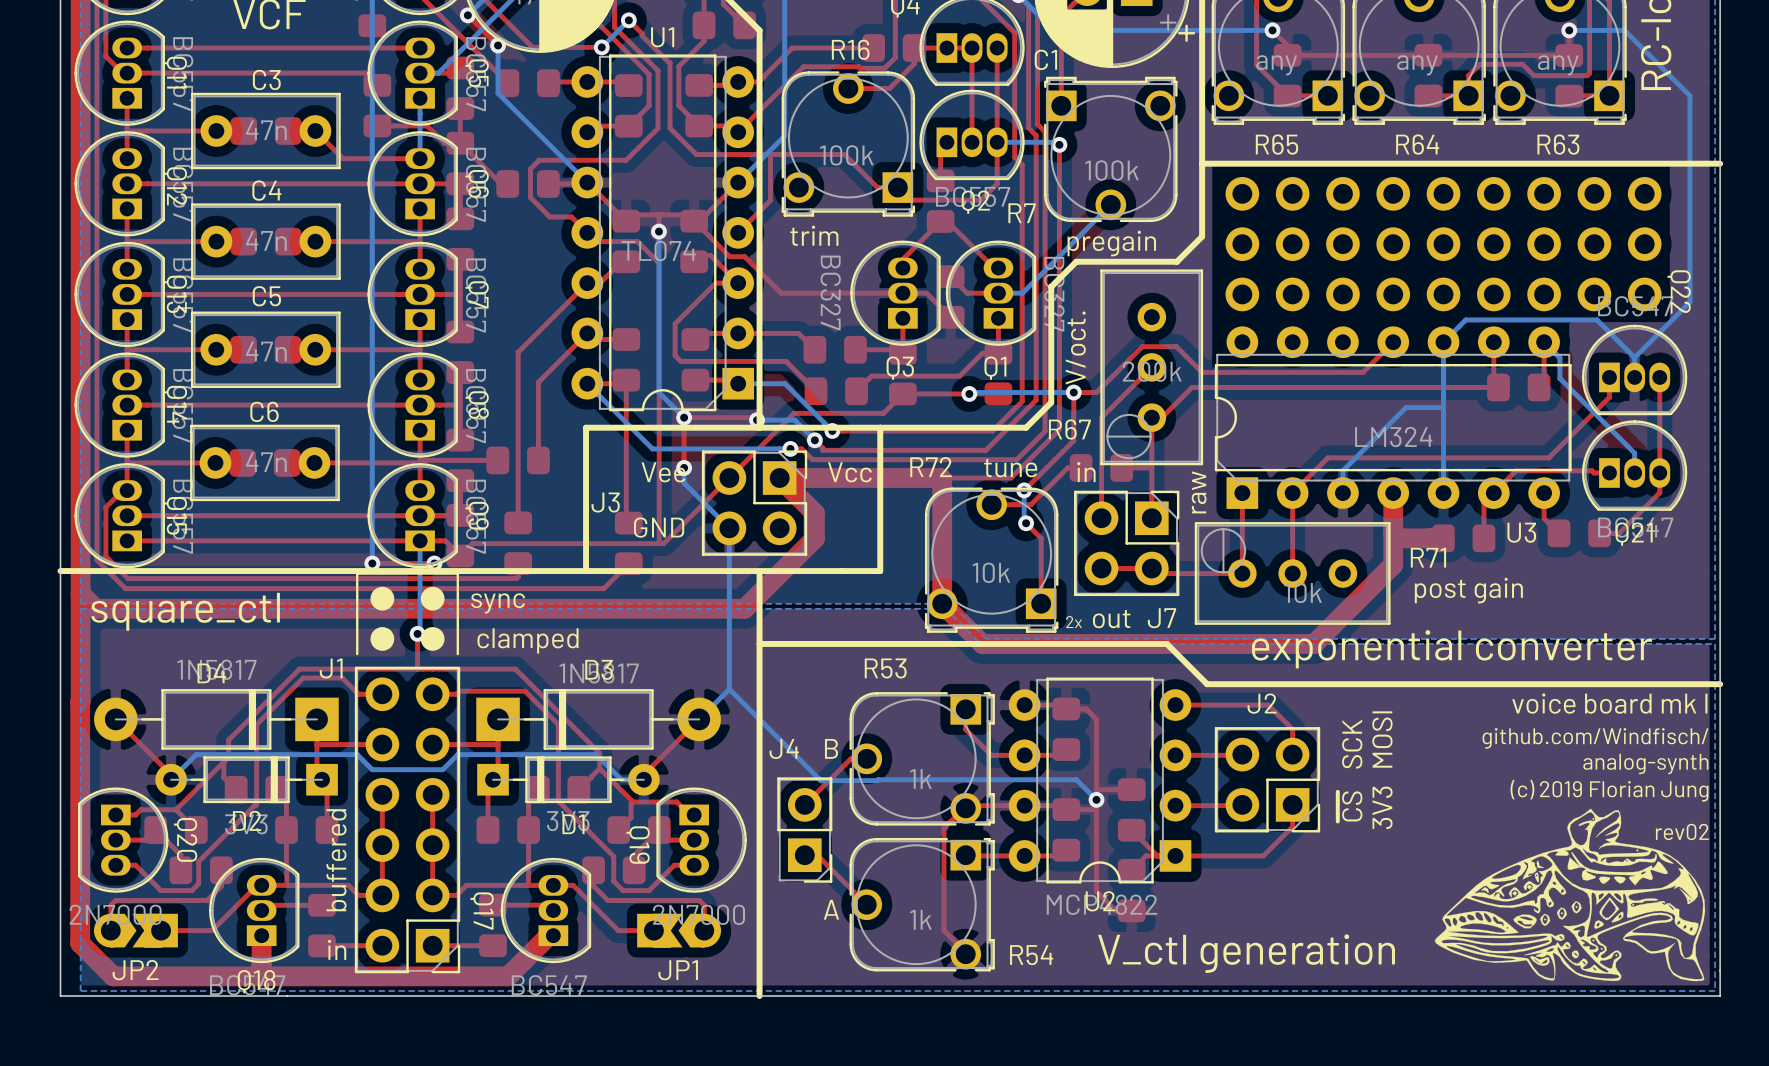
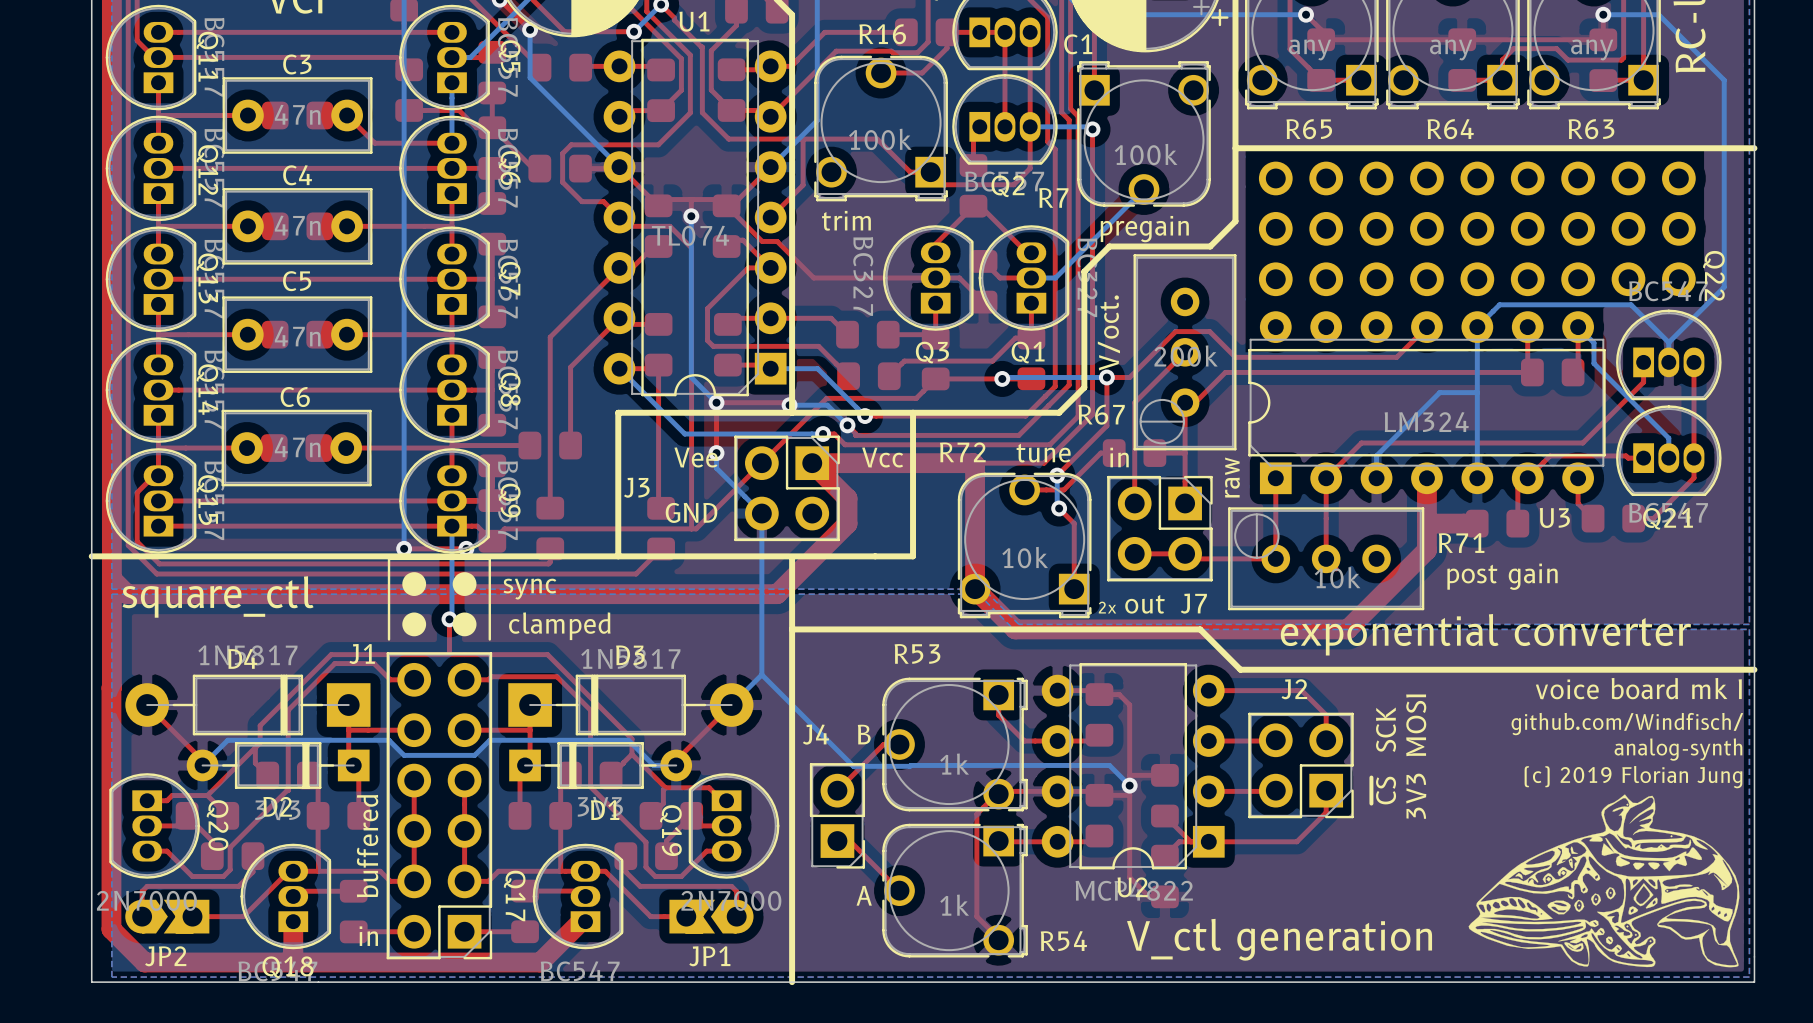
text: rev02 (1682, 831) -> none

